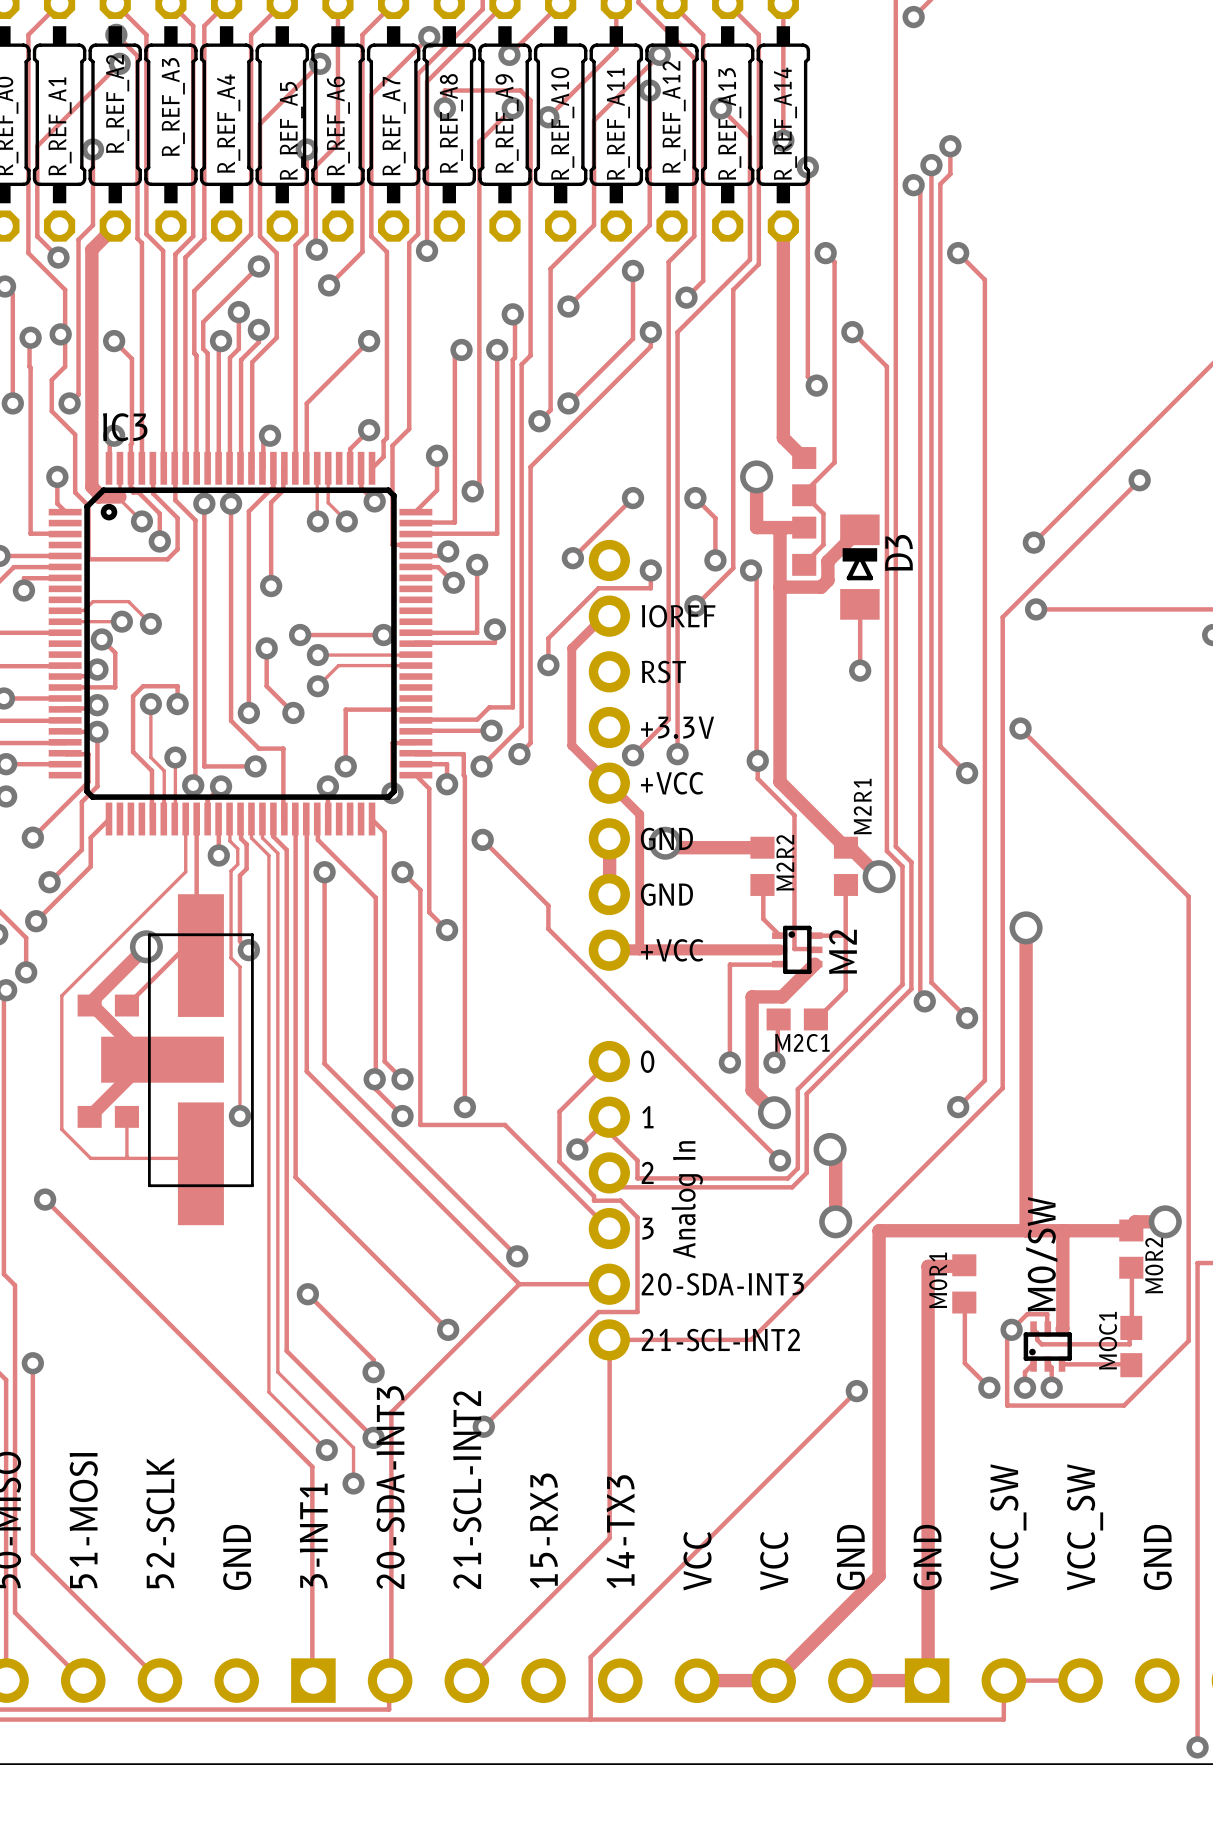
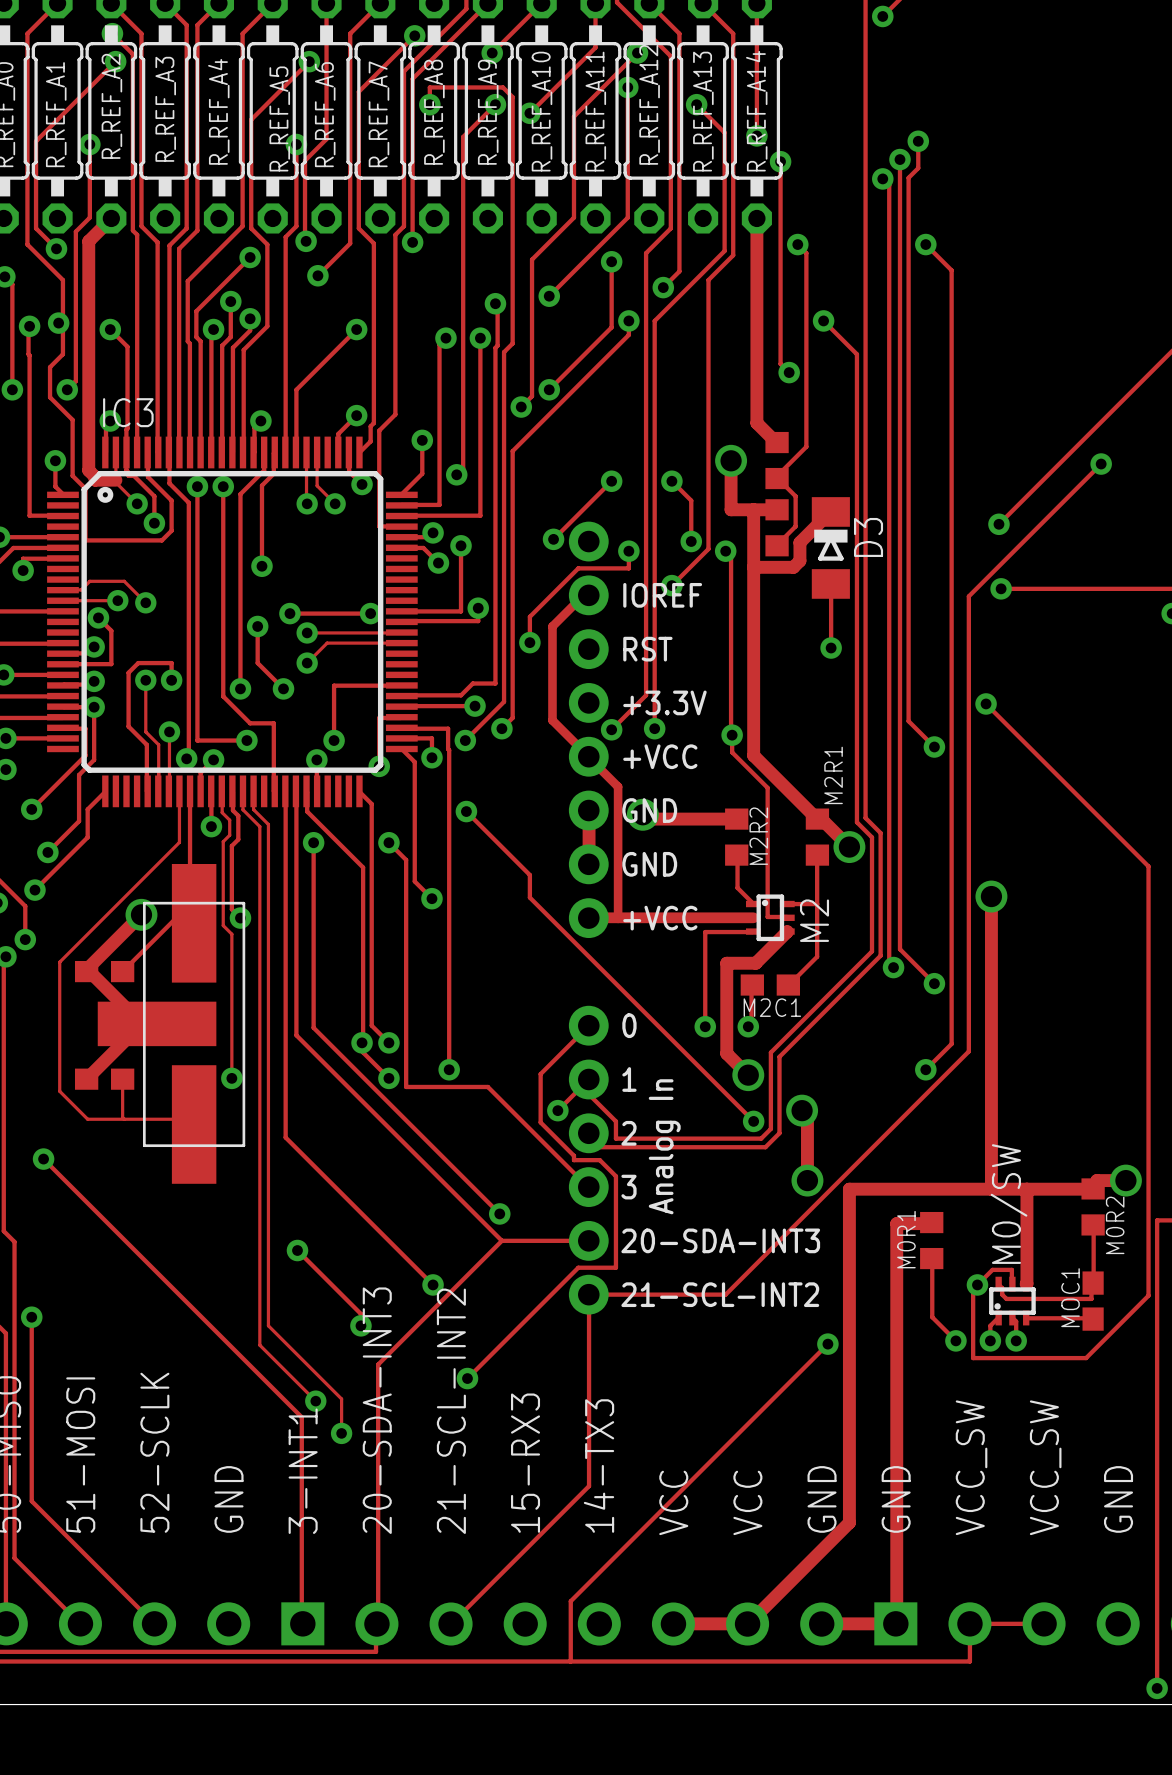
track: (273, 819) (273, 836) (286, 849) (286, 1351) (373, 1437) -> none
via: (373, 1437) -> none

